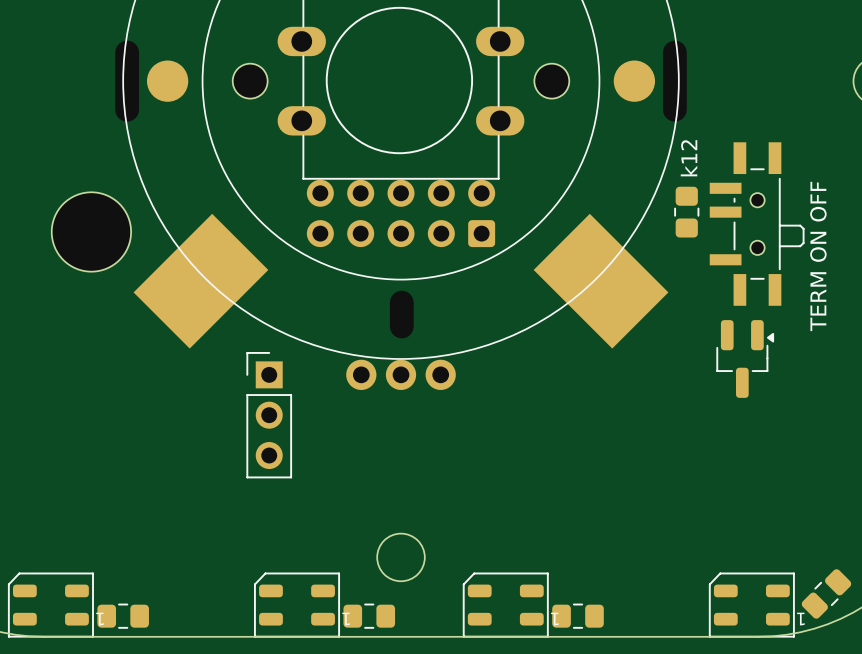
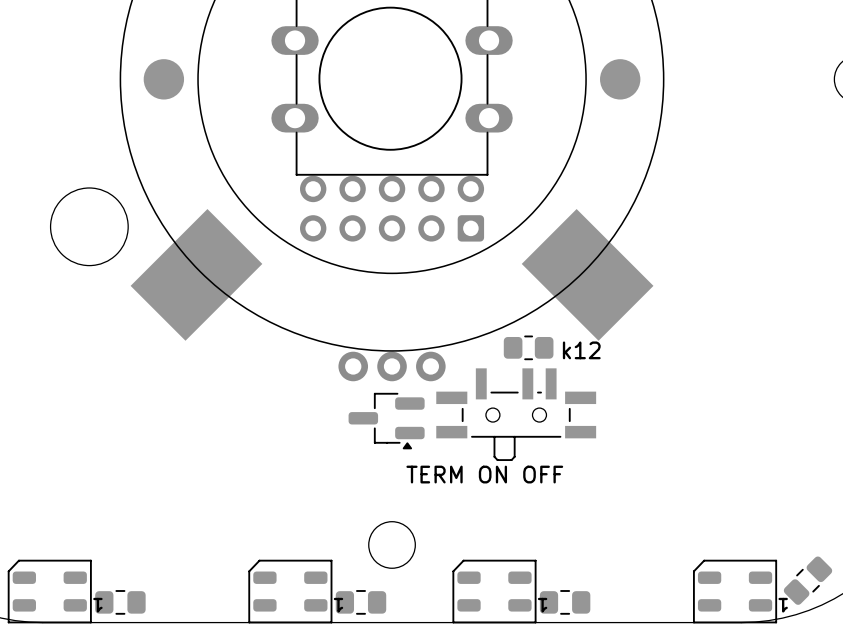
part: (250, 81) -> none
part: (551, 81) -> none
part rotation: 0° (686, 212) -> 90° clockwise (528, 347)
part position: (686, 212) -> (528, 347)
part rotation: 0° (757, 224) -> 90° clockwise (516, 414)
part position: (757, 224) -> (516, 414)
part rotation: 0° (745, 358) -> 90° clockwise (386, 421)
part position: (745, 358) -> (386, 421)
part: (269, 415) -> none

